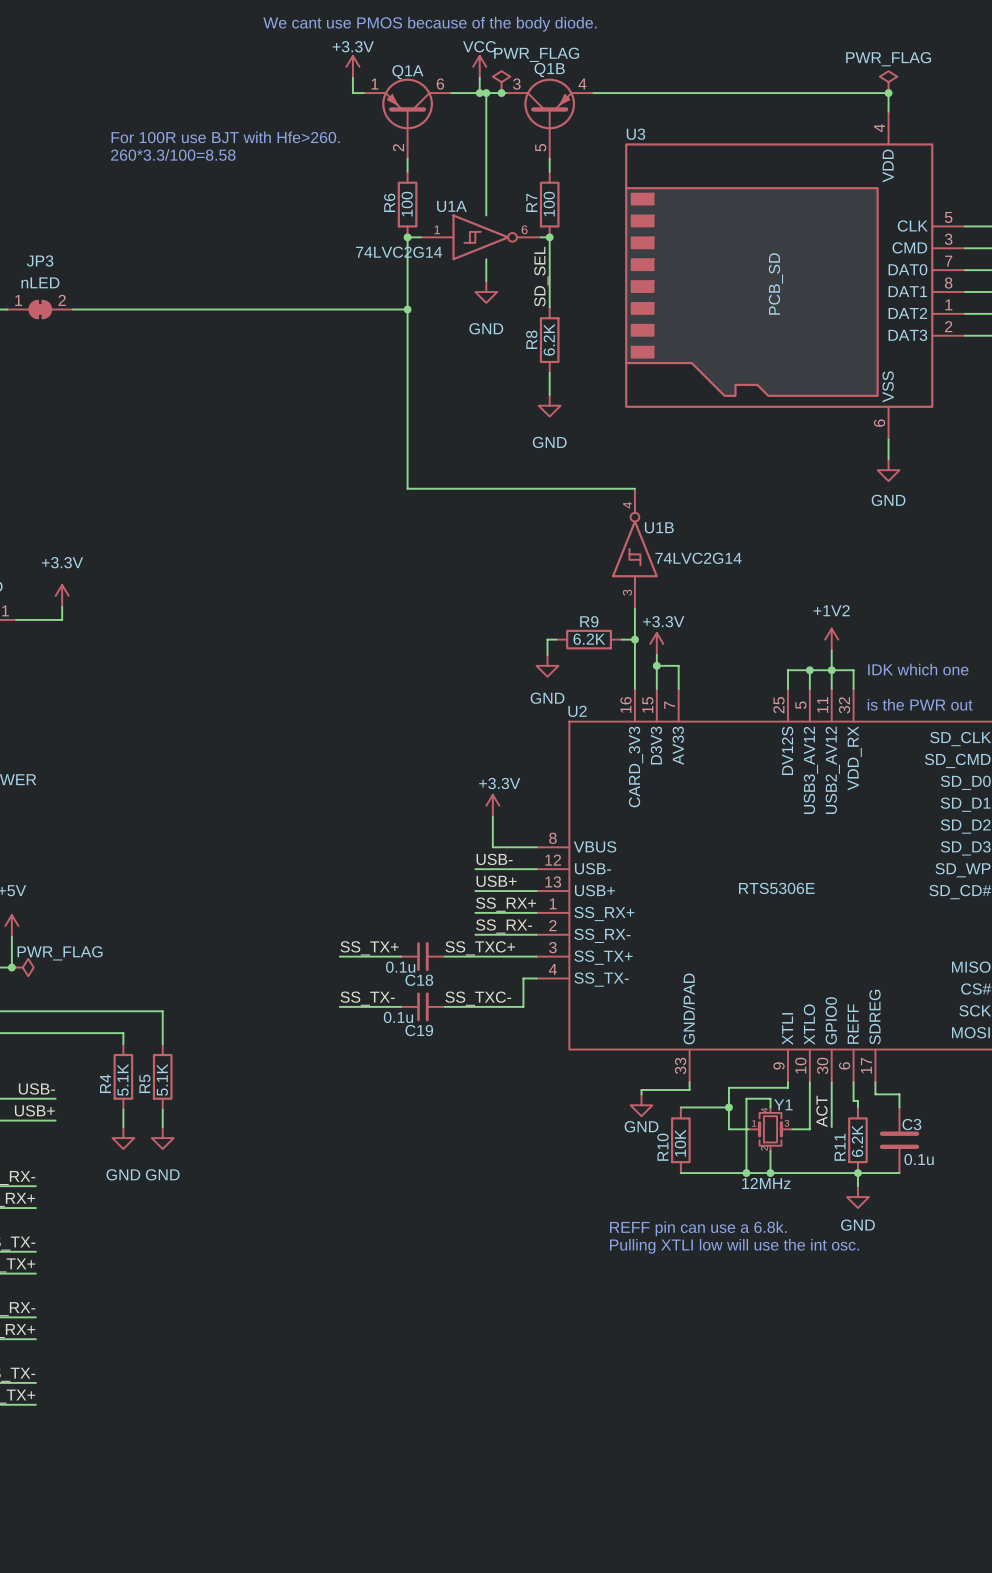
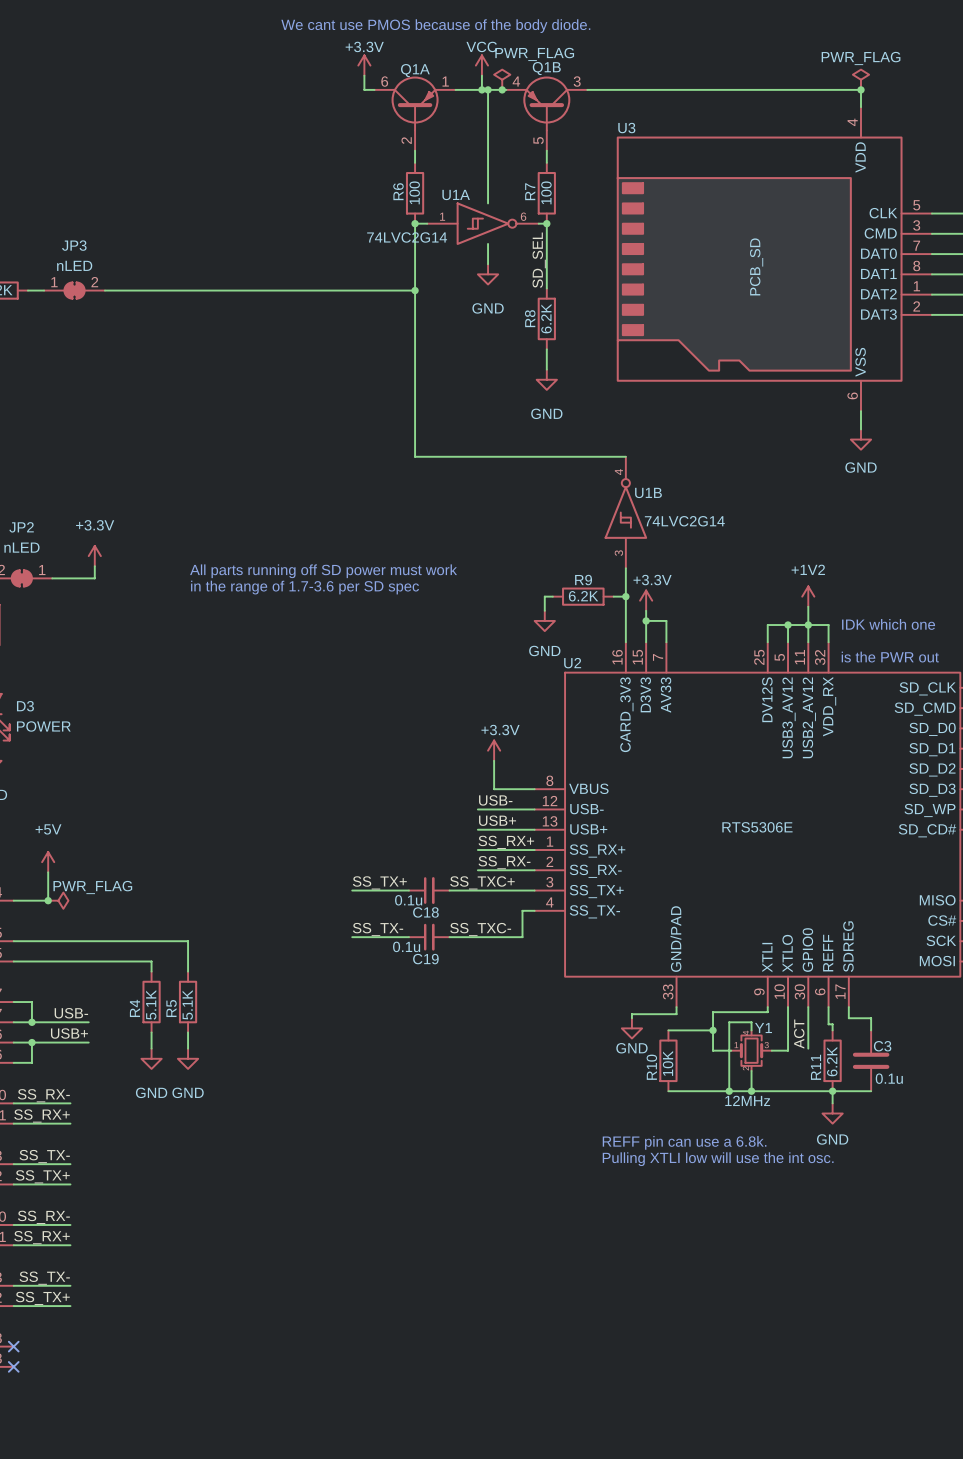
Q1A flip: as is (407, 107) -> left-right (415, 103)
Q1B flip: as is (549, 107) -> left-right (546, 103)
text: For 100R use BJT with Hfe>260. (225, 137) -> none
text: 260*3.3/100=8.58 (173, 154) -> none
text: none -> All parts running off SD power must work (323, 571)
text: none -> in the range of 1.7-3.6 per SD spec (305, 587)

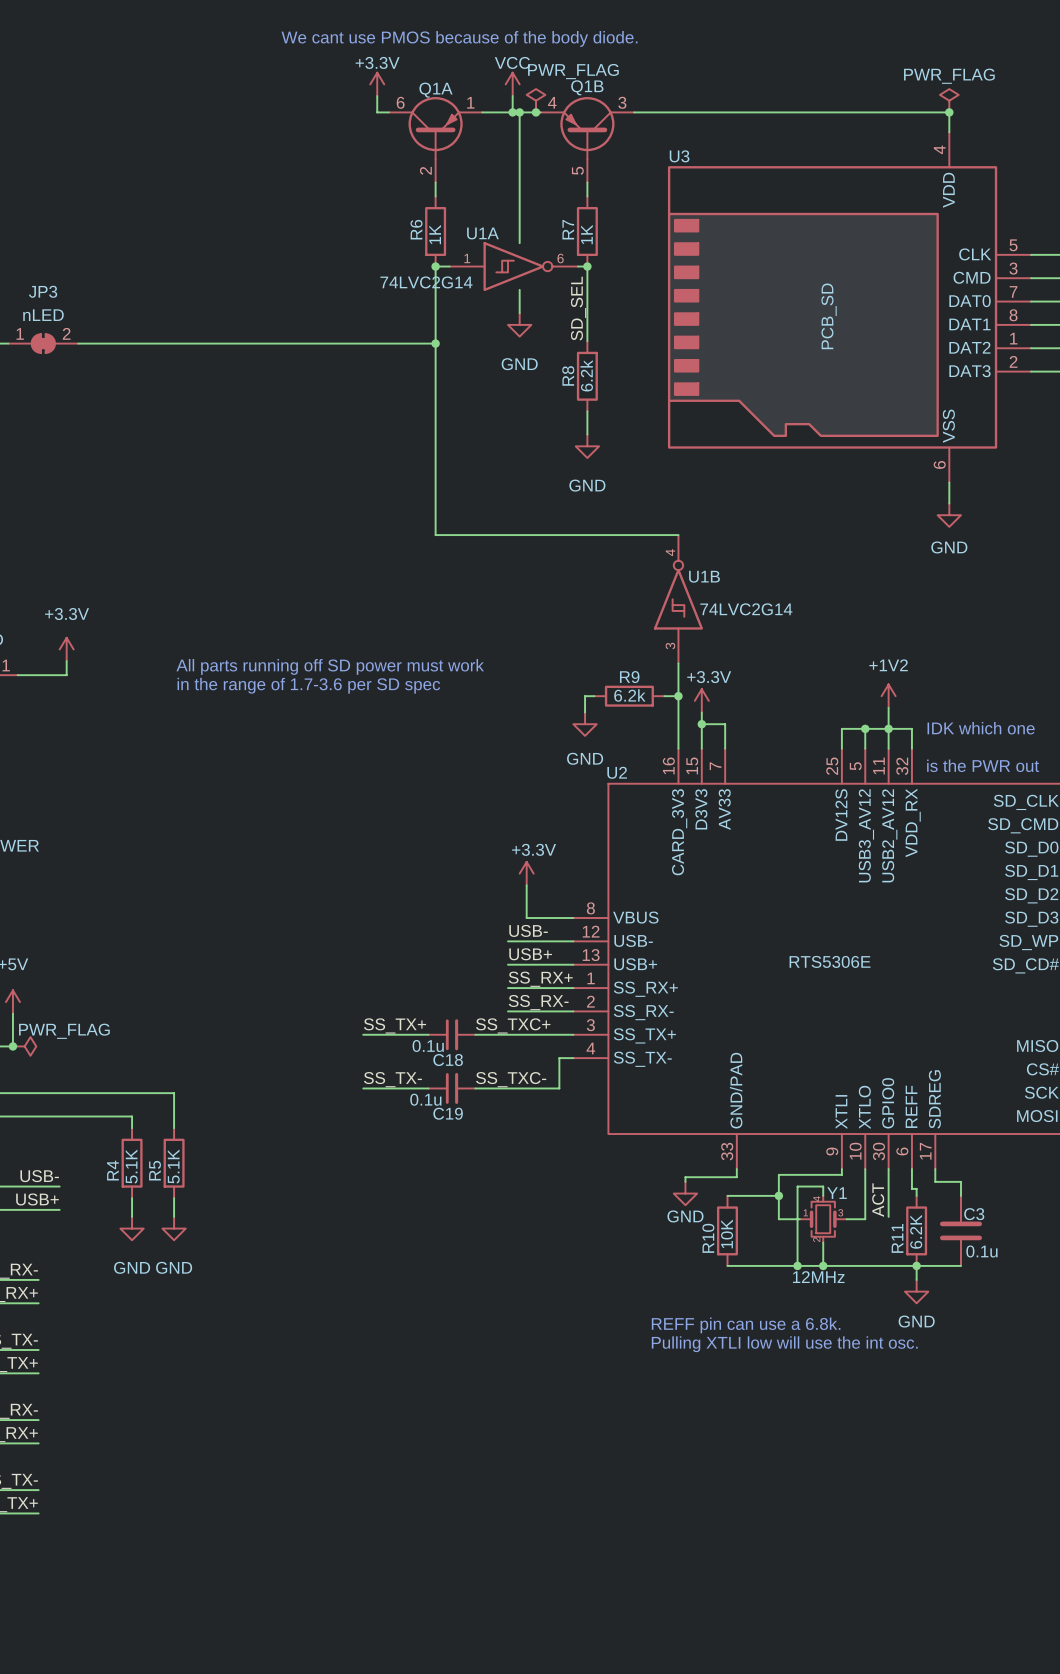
R6 value: 100 (414, 192) -> 1K (435, 234)
R7 value: 100 (546, 192) -> 1K (586, 234)
R8 value: 6.2K (546, 318) -> 6.2k (586, 375)
R9 value: 6.2K (583, 596) -> 6.2k (629, 695)

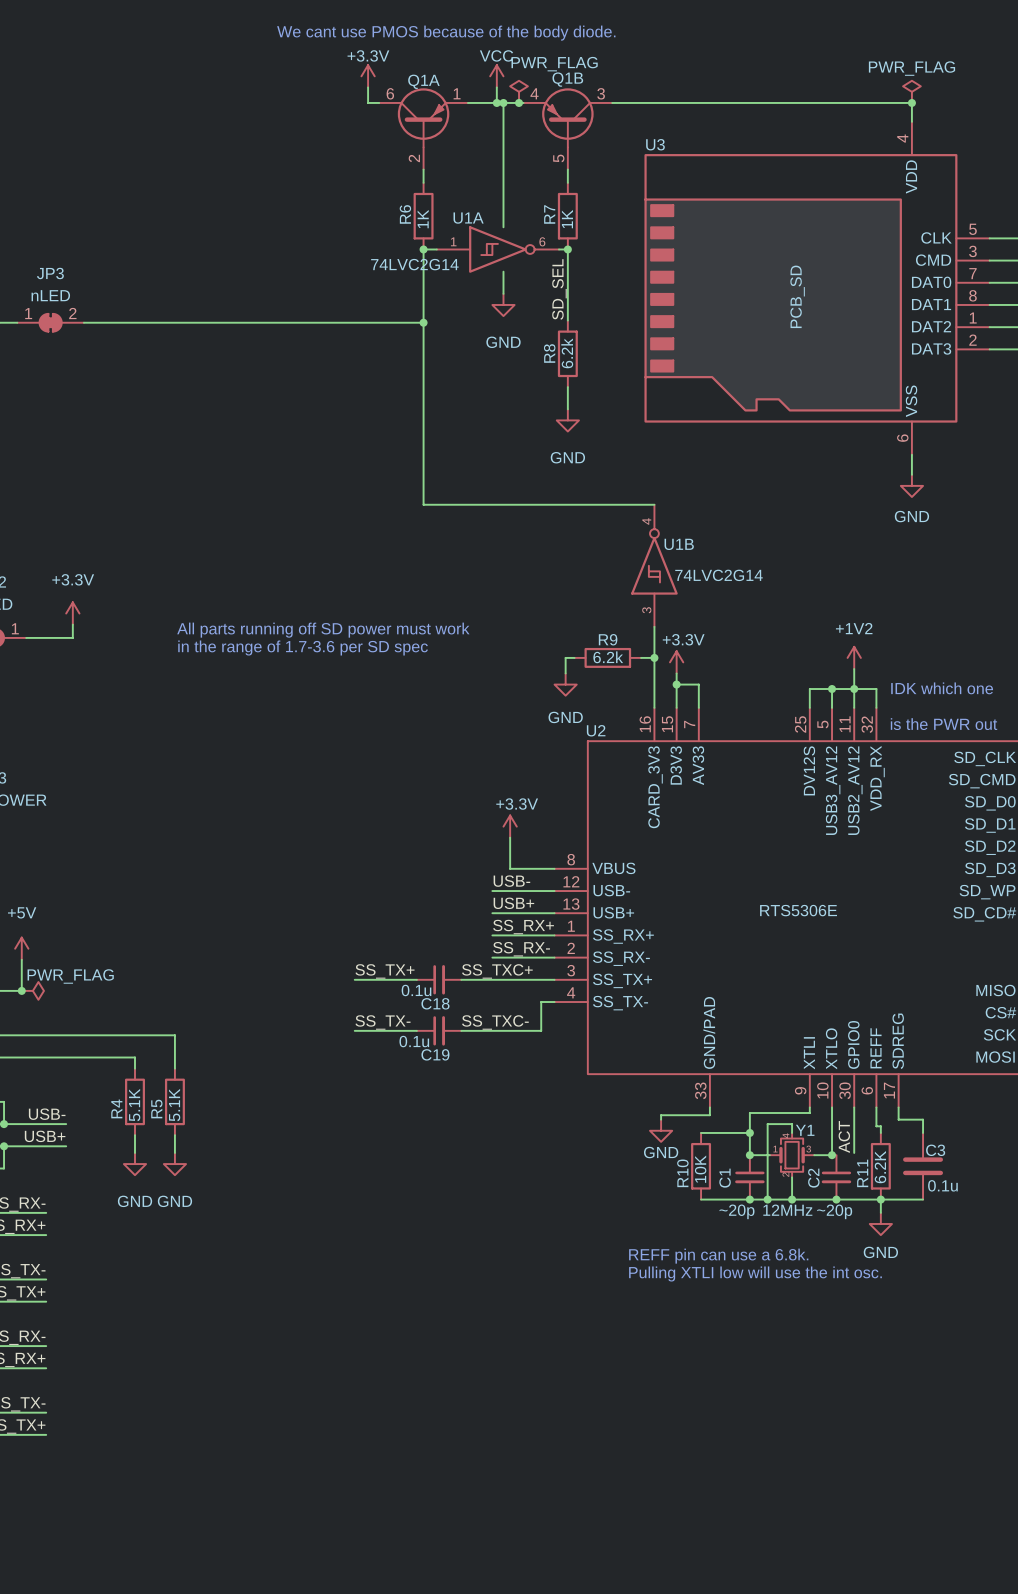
junction: none -> (749, 1155)
junction: none -> (832, 1155)
C1: none -> ~20p (749, 1177)
C2: none -> ~20p (836, 1177)
junction: none -> (749, 1199)
junction: none -> (836, 1199)

